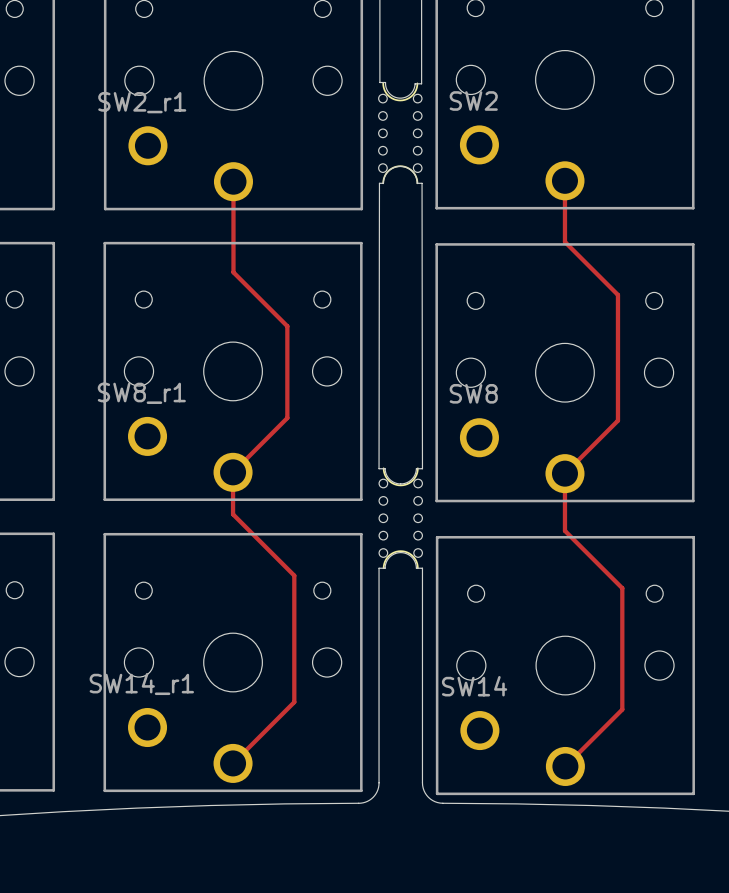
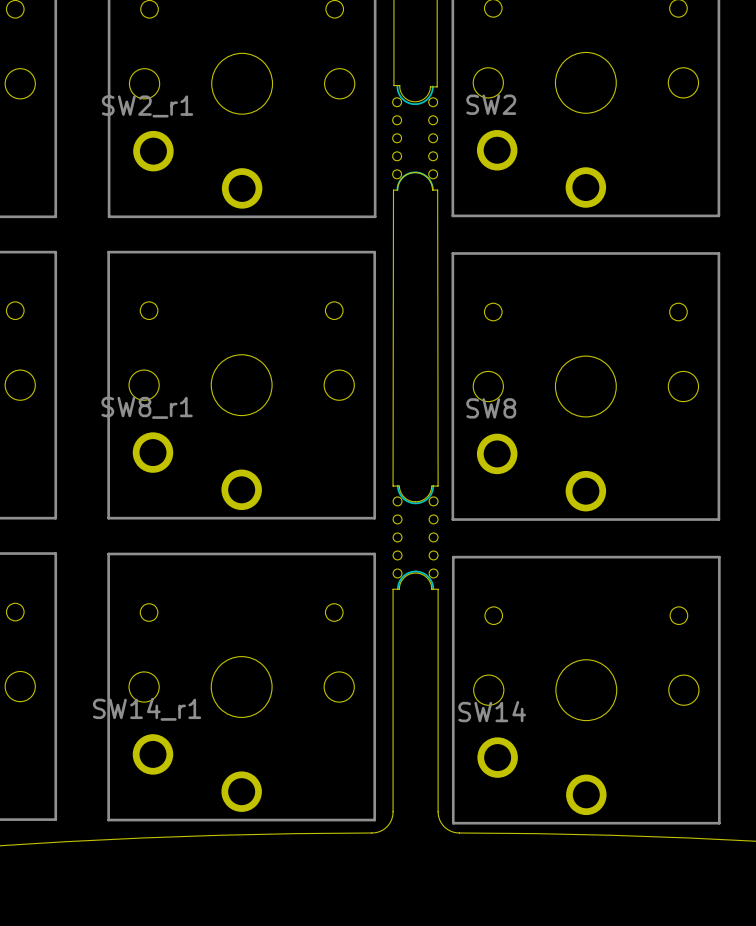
track: (564, 180) (564, 241) (617, 294) (617, 420) (564, 473) (564, 530) (622, 588) (622, 709) (565, 766) -> none
track: (233, 181) (233, 272) (287, 326) (287, 418) (233, 472) (233, 514) (294, 575) (294, 702) (233, 763) -> none

